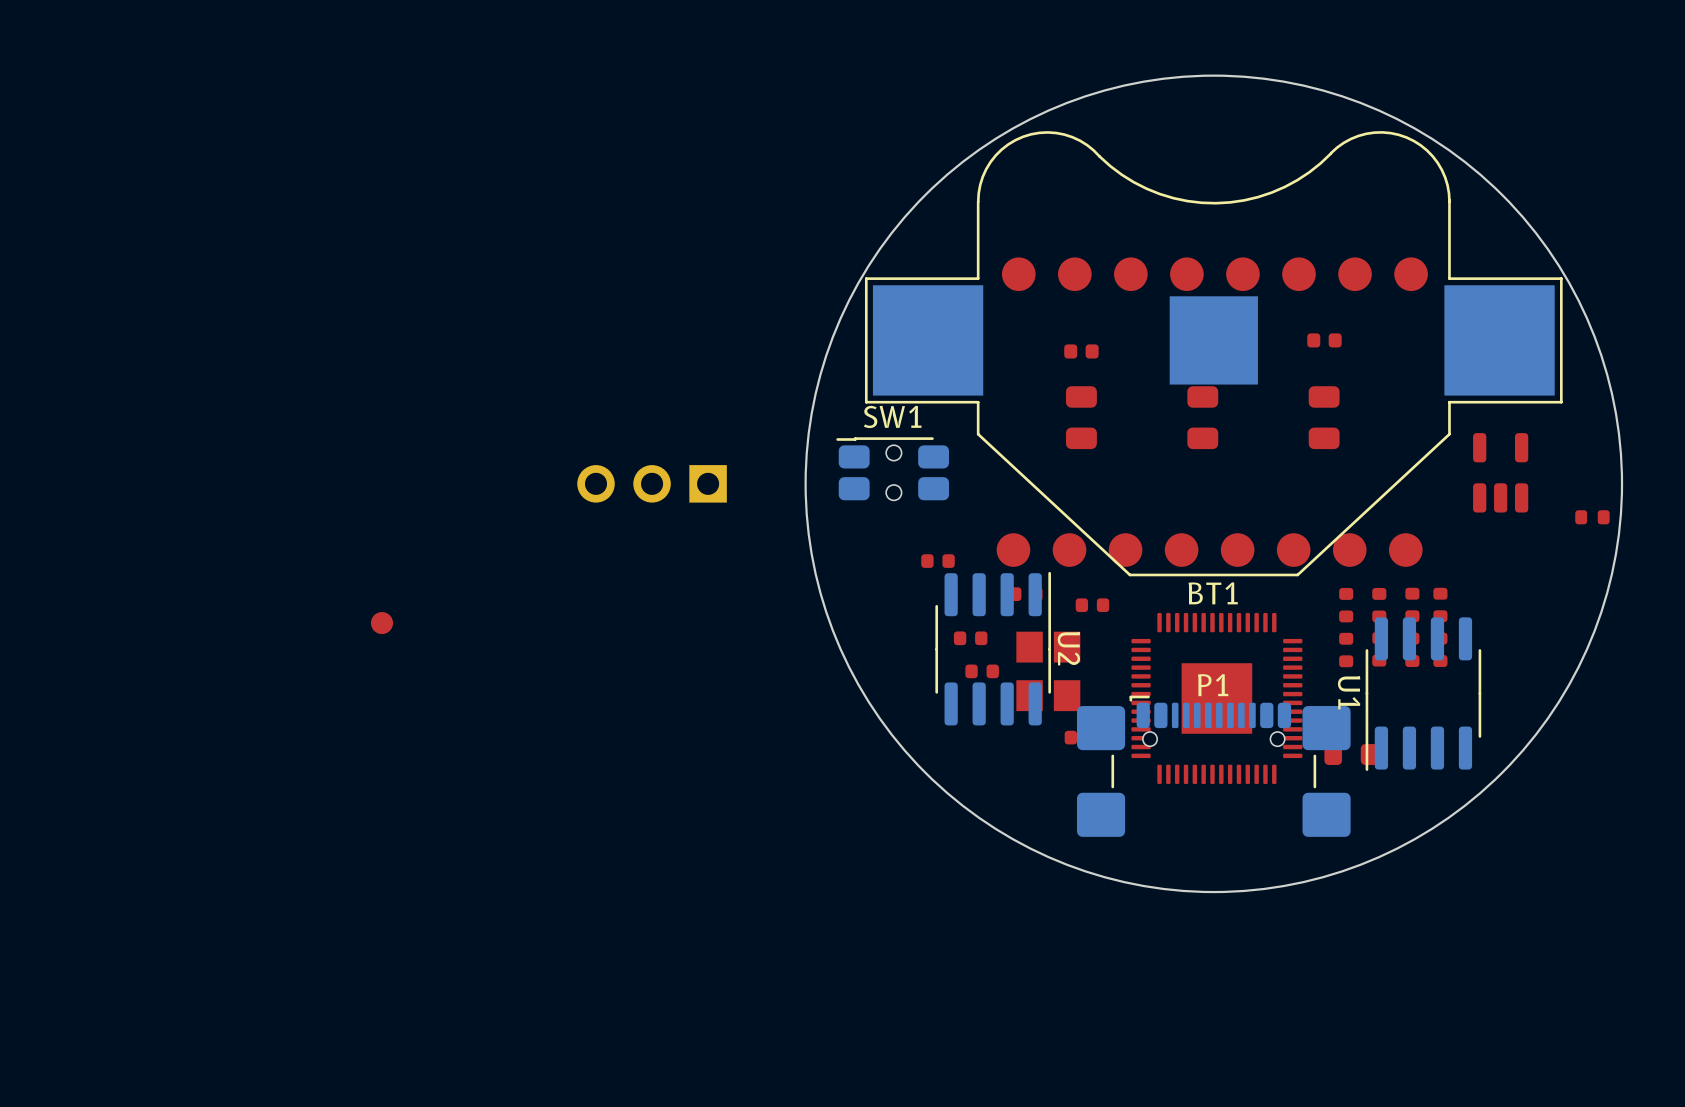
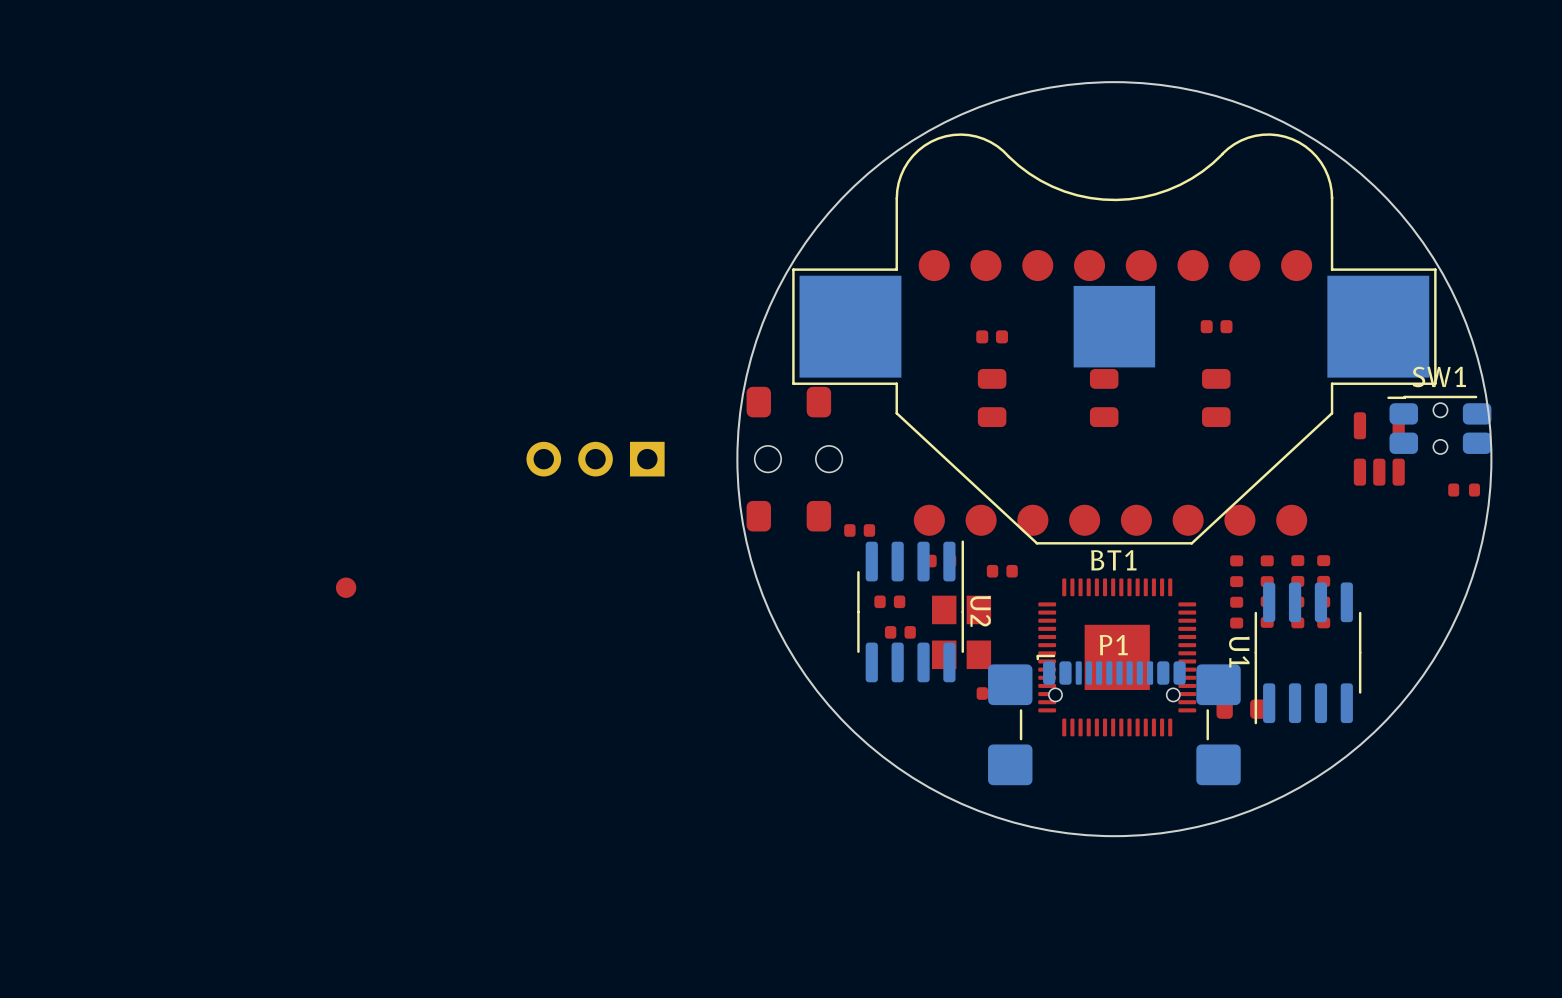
SW1 position: (892, 468) -> (1439, 424)
part: none -> (794, 459)

